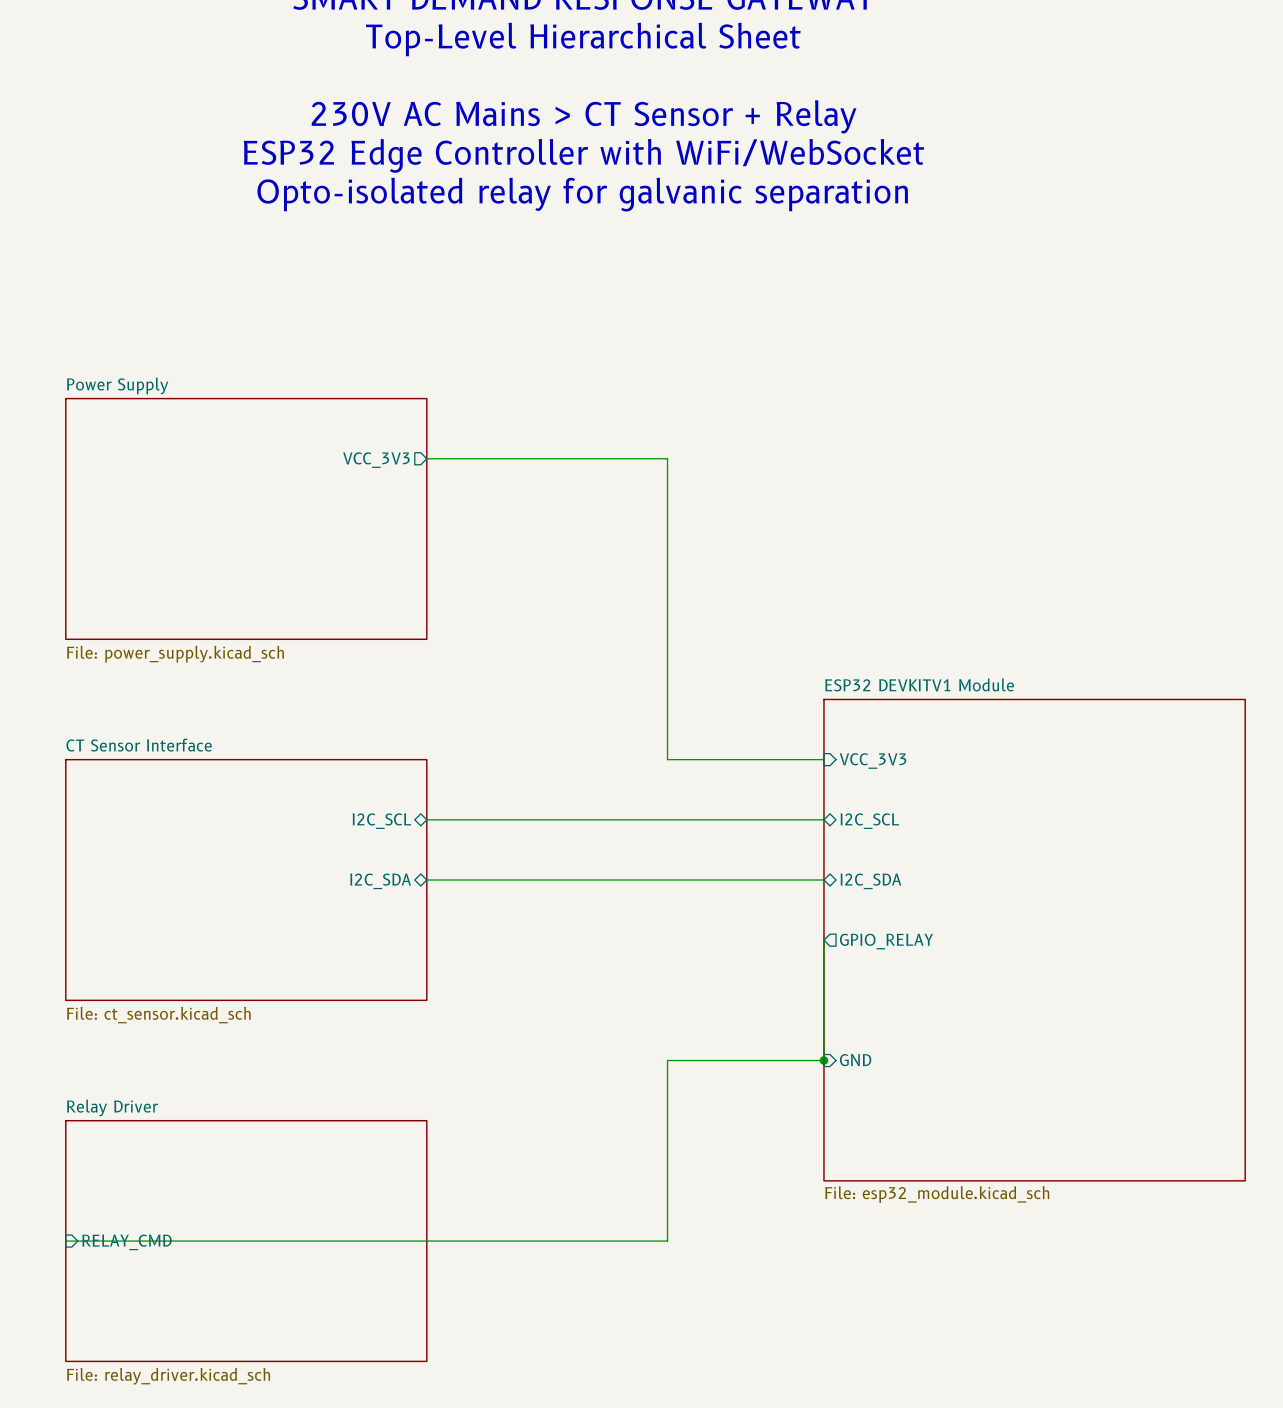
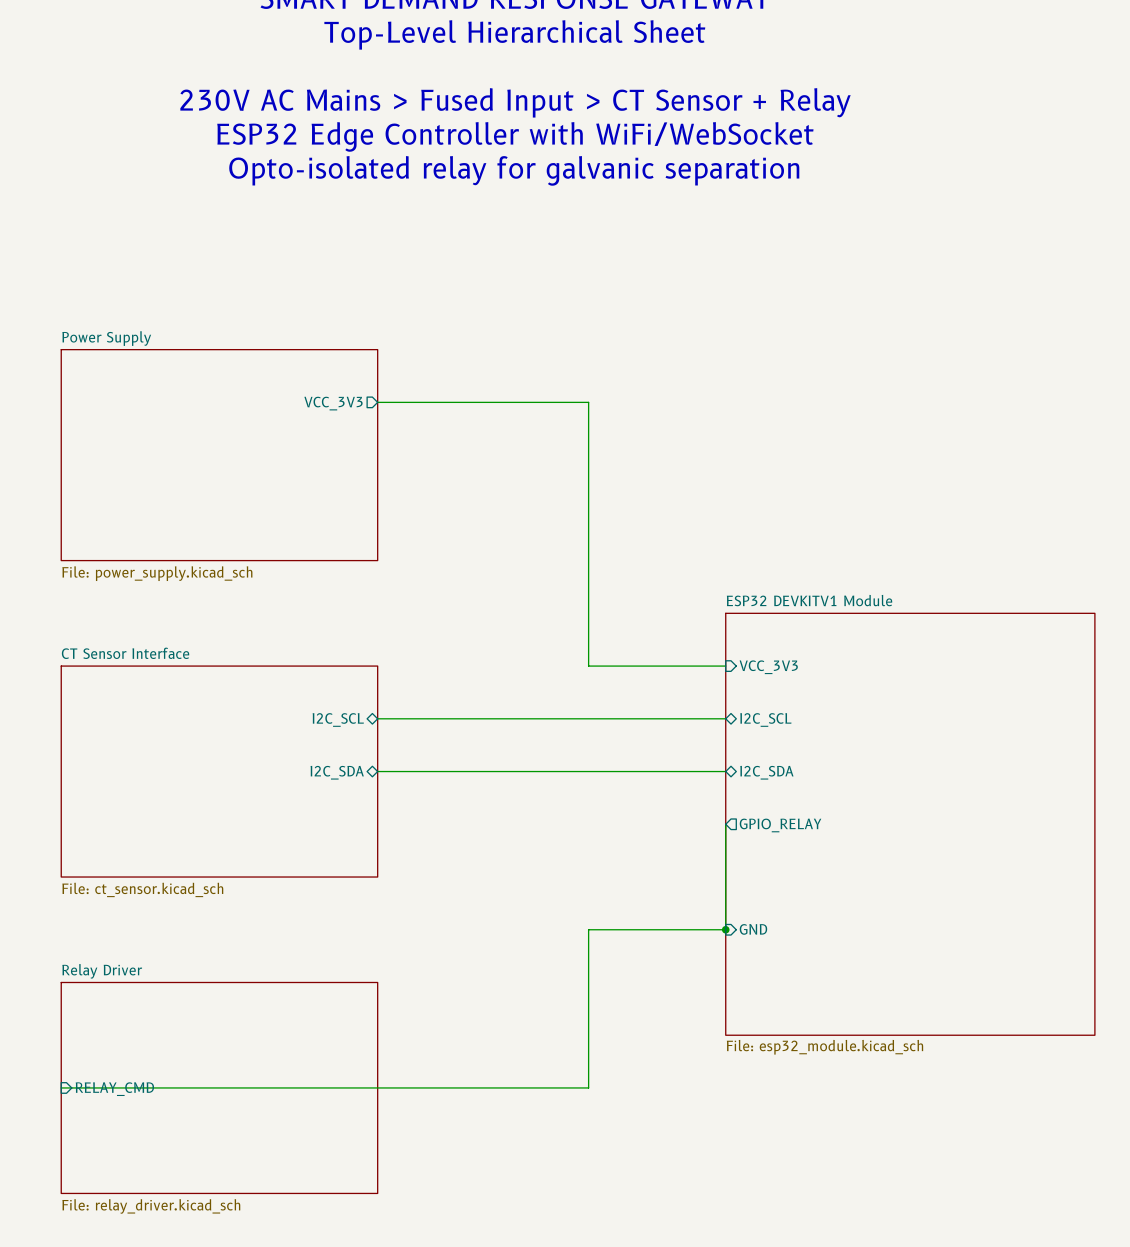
text: 230V AC Mains > CT Sensor + Relay (584, 116) -> 230V AC Mains > Fused Input > CT Sensor + Relay (515, 102)

